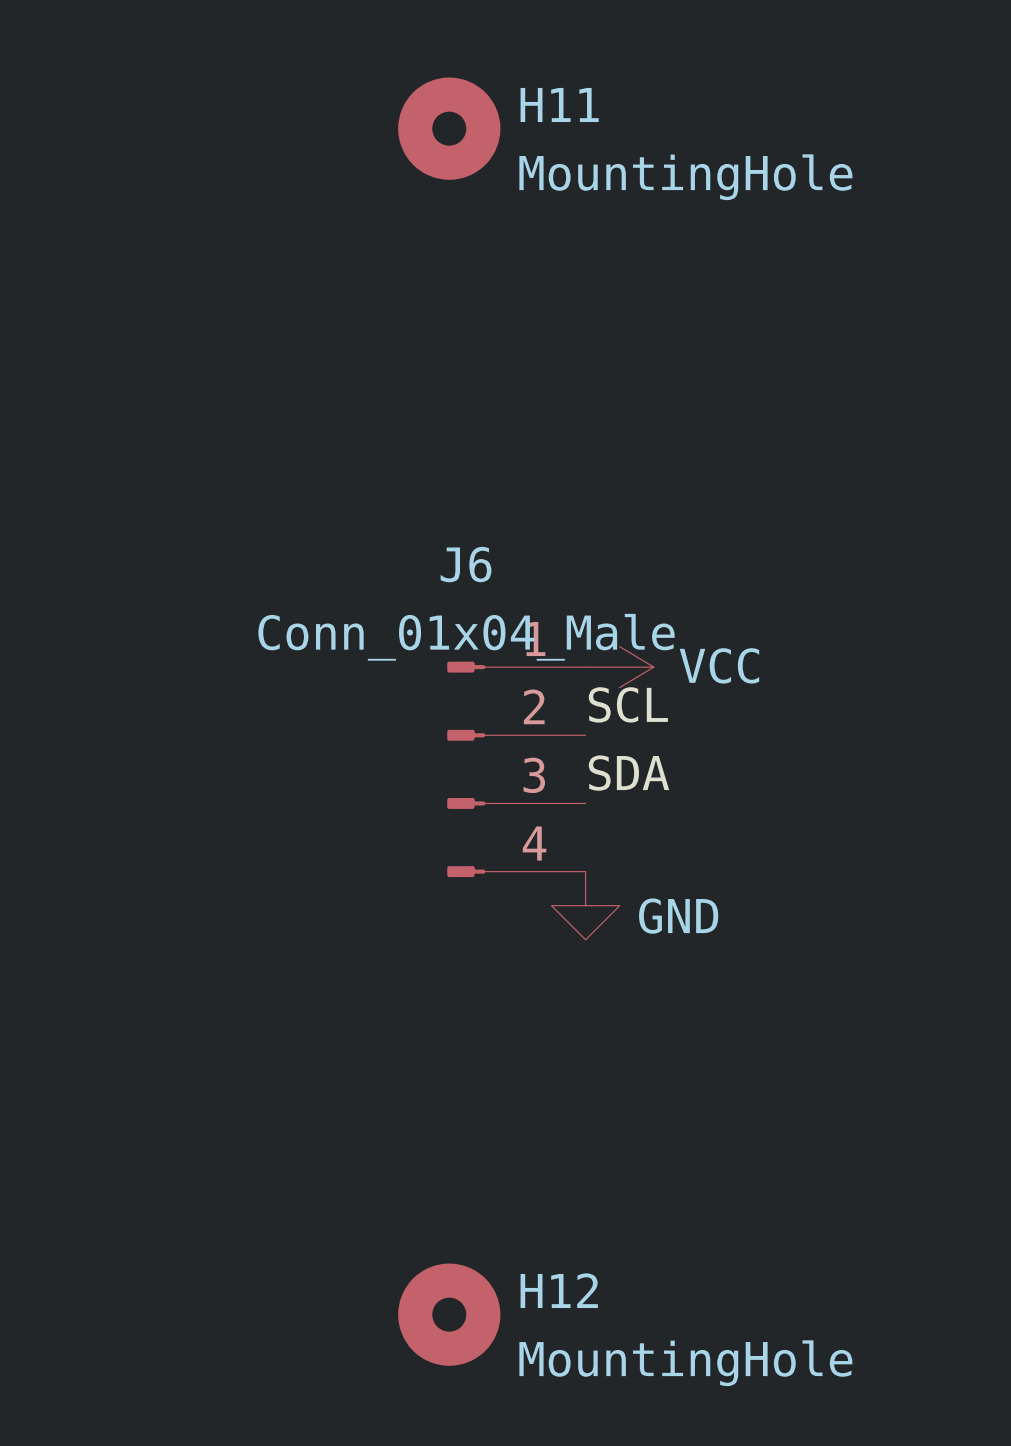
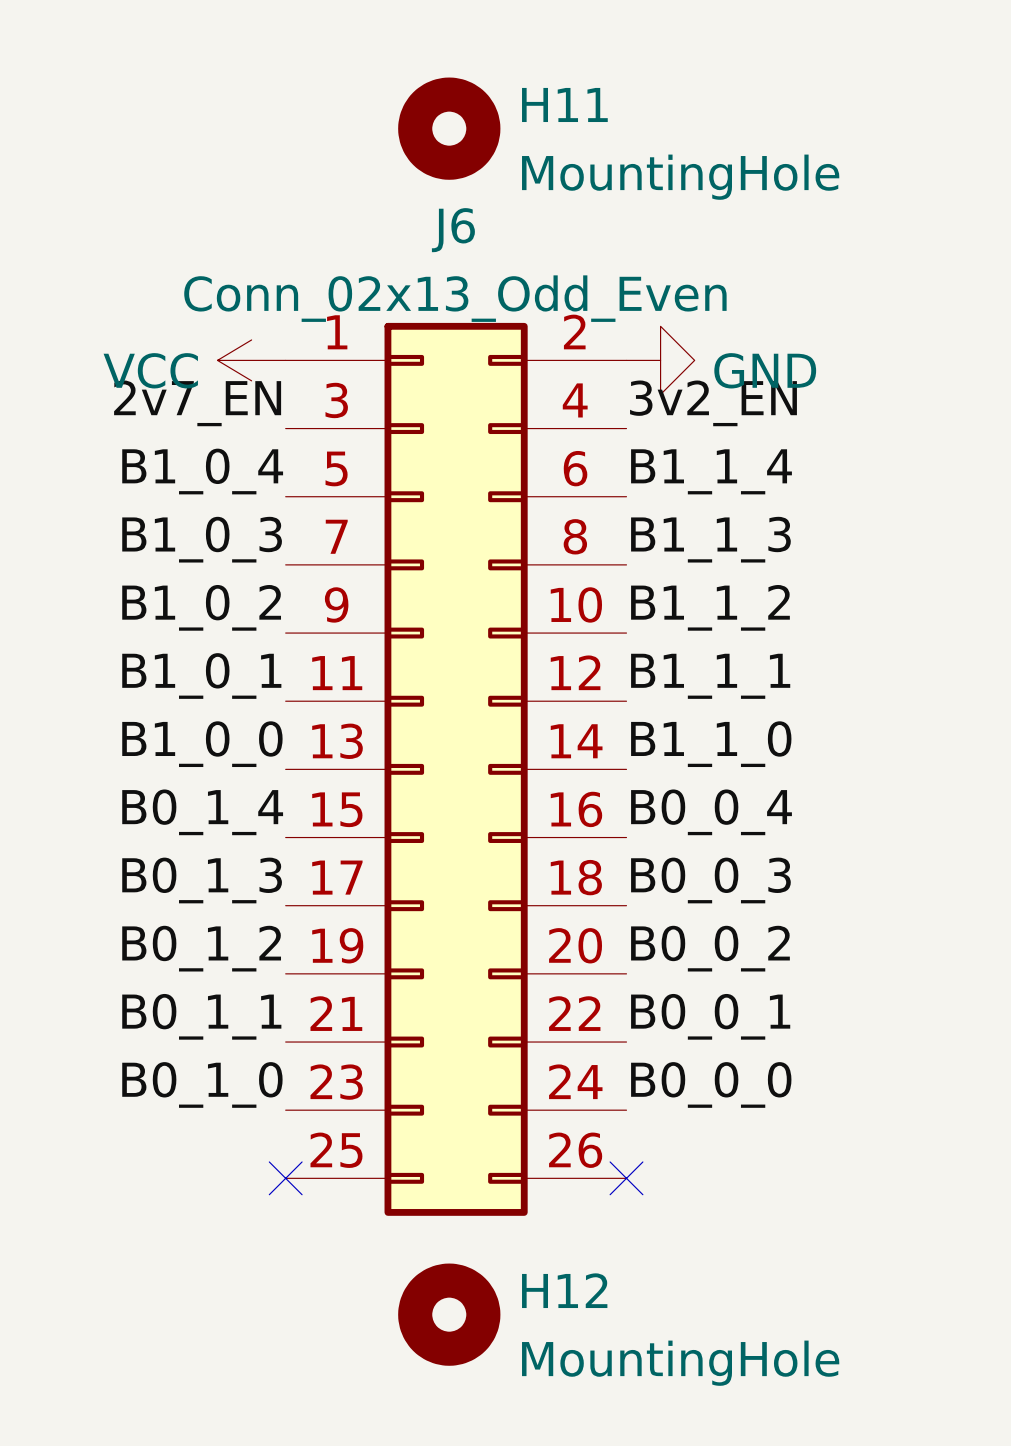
label: none -> 2v7_EN (197, 403)
label: none -> 3v2_EN (713, 403)
label: none -> B1_0_4 (202, 471)
label: none -> B1_1_4 (711, 471)
label: none -> B1_0_3 (202, 539)
label: none -> B1_1_3 (710, 539)
J6 name position: J6 (466, 564) -> J6 (453, 230)
label: none -> B1_0_2 (201, 607)
label: none -> B1_1_2 (710, 607)
J6 value: Conn_01x04_Male (466, 637) -> Conn_02x13_Odd_Even (455, 298)
J6 symbol: [447, 661, 586, 878] -> [285, 322, 627, 1216]
power symbol rotation: 0° (619, 667) -> 180° (251, 360)
power symbol position: VCC (619, 667) -> VCC (251, 360)
label: none -> B1_0_1 (201, 676)
label: none -> B1_1_1 (710, 676)
label: SCL (628, 704) -> none
label: none -> B1_0_0 (202, 744)
label: none -> B1_1_0 (711, 744)
label: SDA (628, 773) -> none
label: none -> B0_1_4 (202, 812)
label: none -> B0_0_4 (711, 812)
label: none -> B0_1_3 (202, 880)
label: none -> B0_0_3 (710, 880)
power symbol rotation: 0° (585, 905) -> 90° counterclockwise (660, 360)
power symbol position: GND (585, 905) -> GND (660, 360)
label: none -> B0_1_2 (201, 948)
label: none -> B0_0_2 (710, 948)
label: none -> B0_1_1 (201, 1016)
label: none -> B0_0_1 (710, 1016)
label: none -> B0_1_0 (202, 1084)
label: none -> B0_0_0 (711, 1084)
no-connect mark: none -> (285, 1178)
no-connect mark: none -> (626, 1178)

